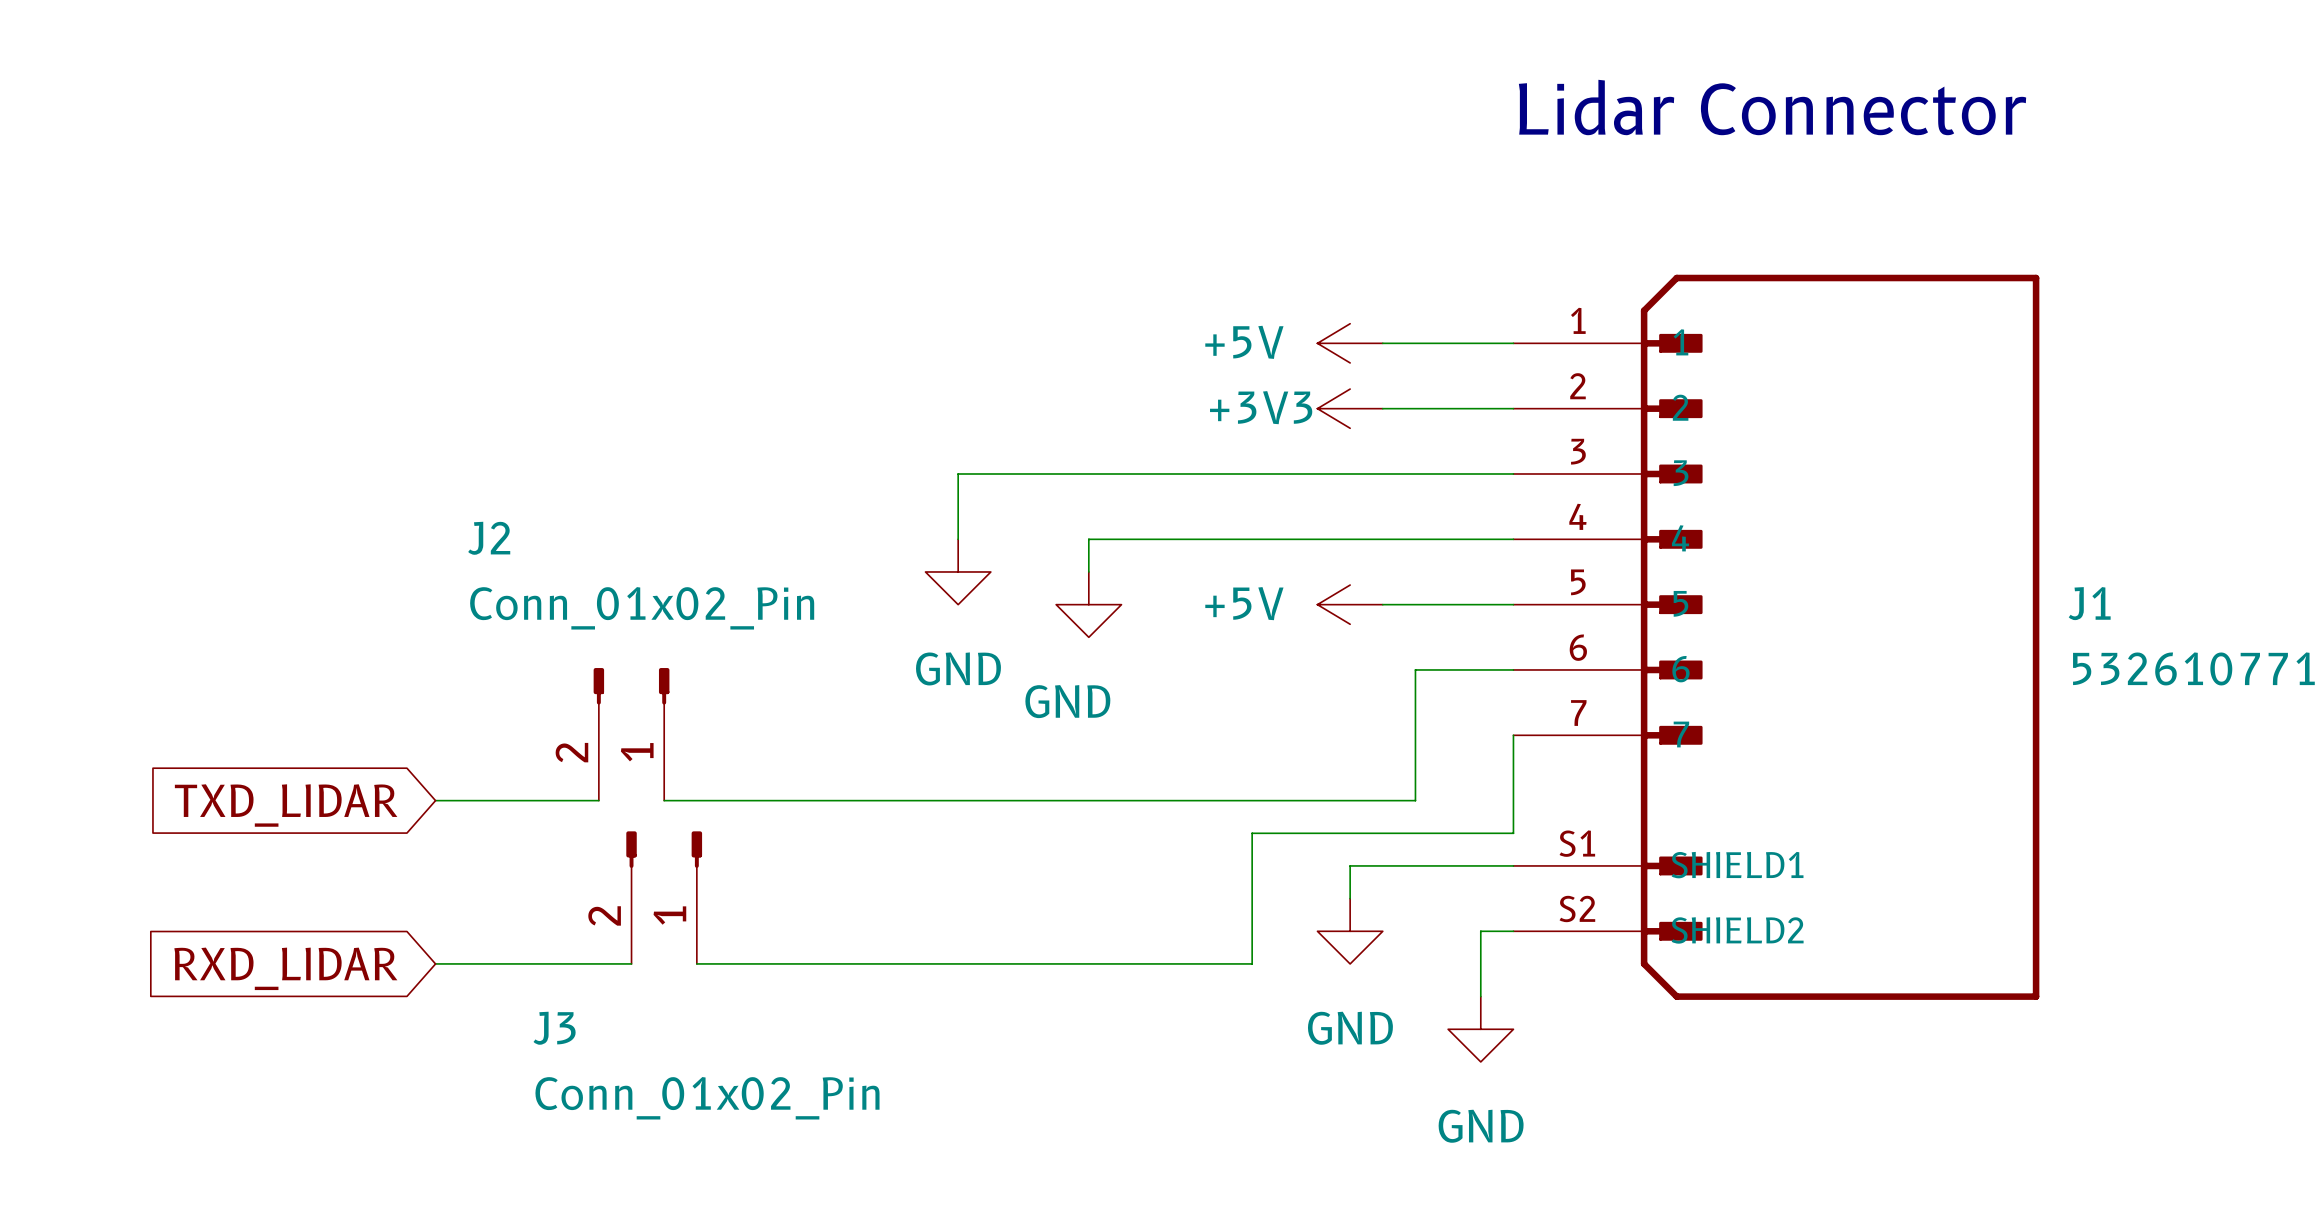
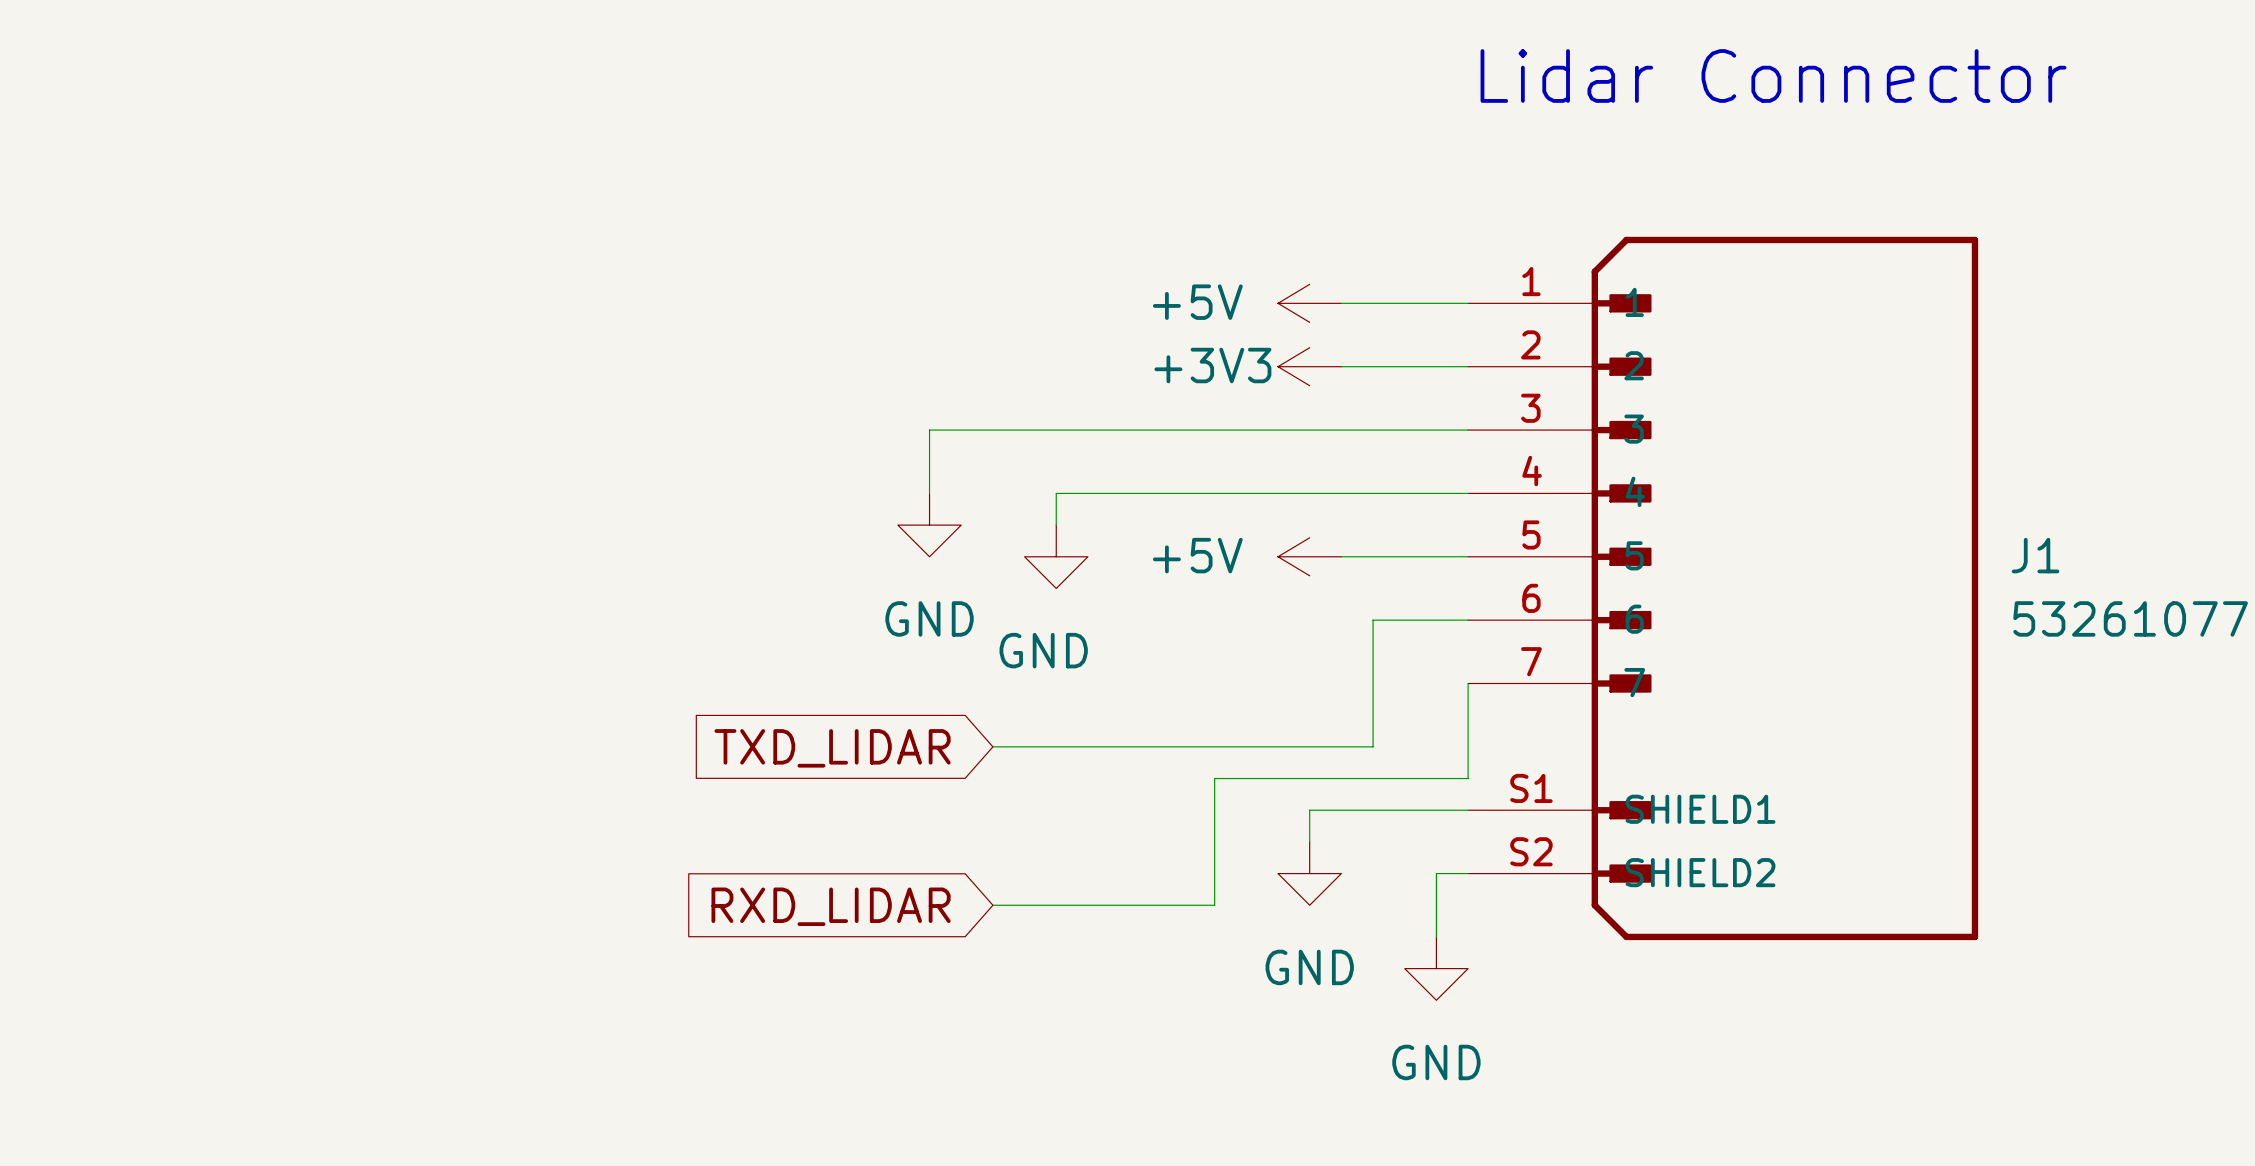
J2: Conn_01x02_Pin (631, 734) -> none
wire: (435, 800) (598, 800) -> none
wire: (664, 800) (1023, 800) -> none
global label position: TXD_LIDAR (286, 805) -> TXD_LIDAR (832, 748)
J3: Conn_01x02_Pin (664, 897) -> none
wire: (435, 963) (631, 963) -> none
wire: (696, 963) (1023, 963) -> none
global label position: RXD_LIDAR (285, 968) -> RXD_LIDAR (831, 906)

